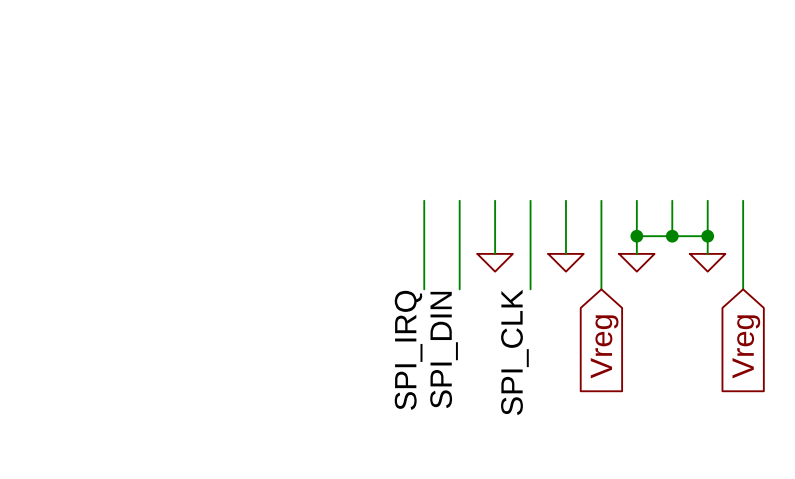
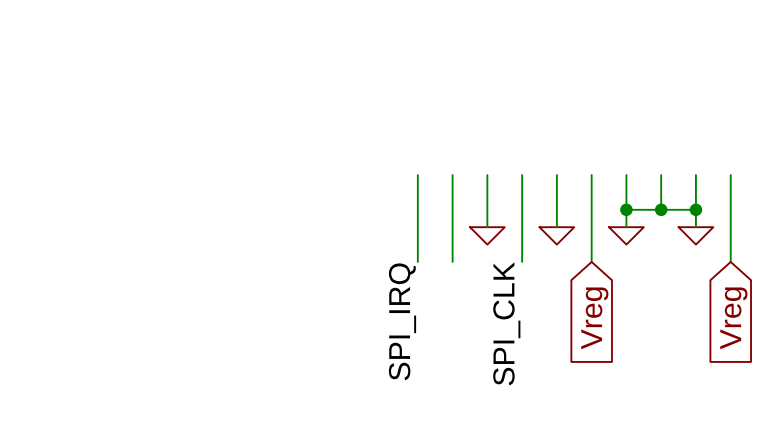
label: SPI_DIN (444, 350) -> none

